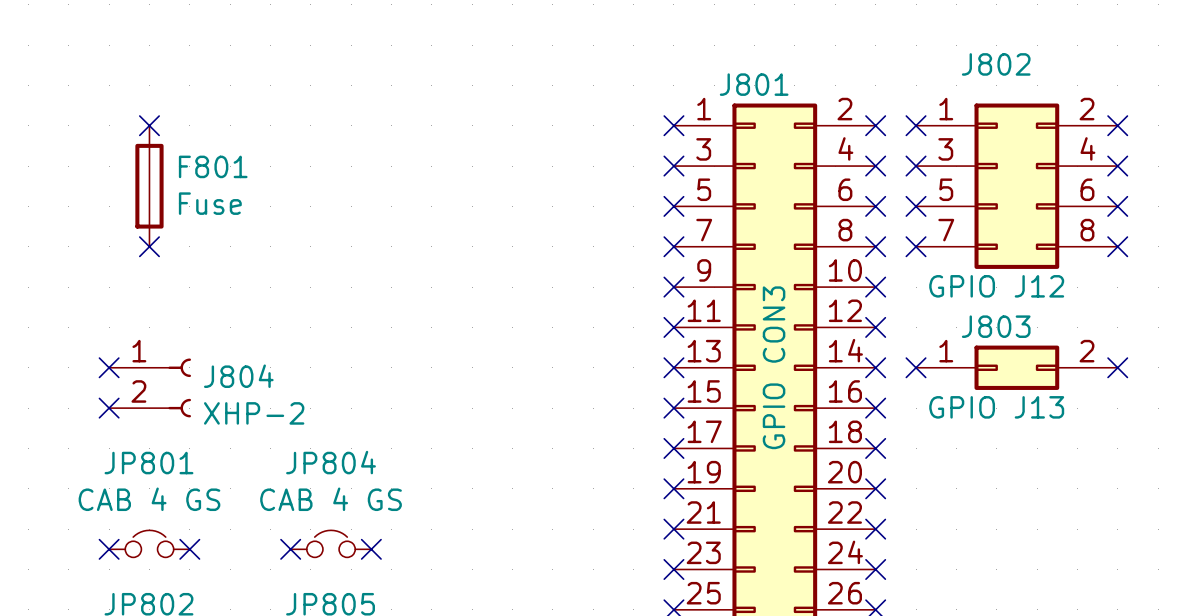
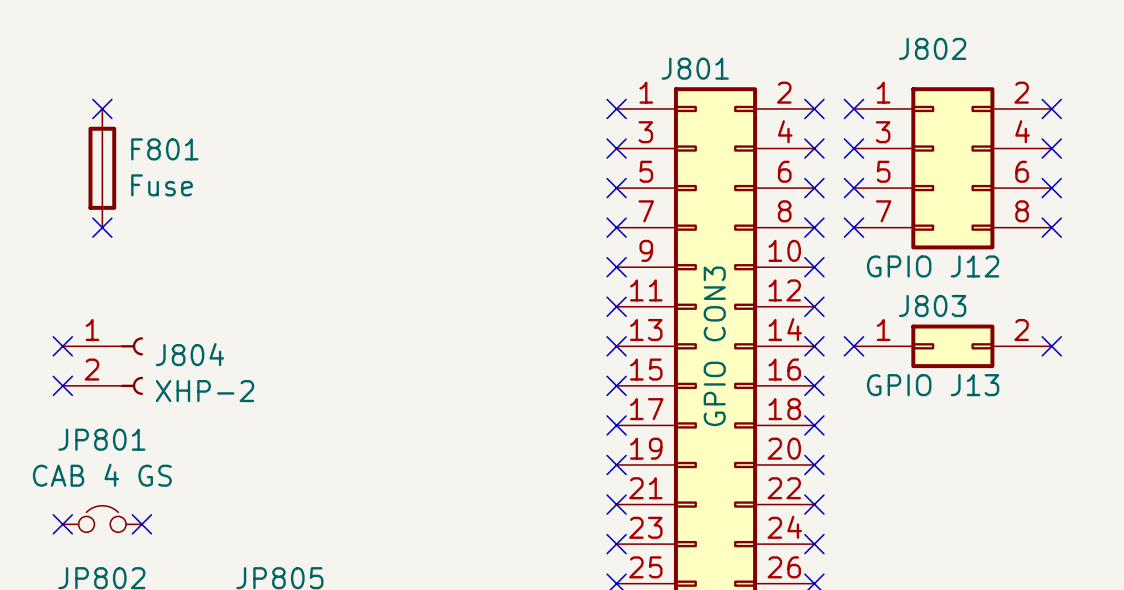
JP804: CAB 4 GS (331, 543) -> none
no-connect mark: (290, 549) -> none
no-connect mark: (371, 549) -> none

